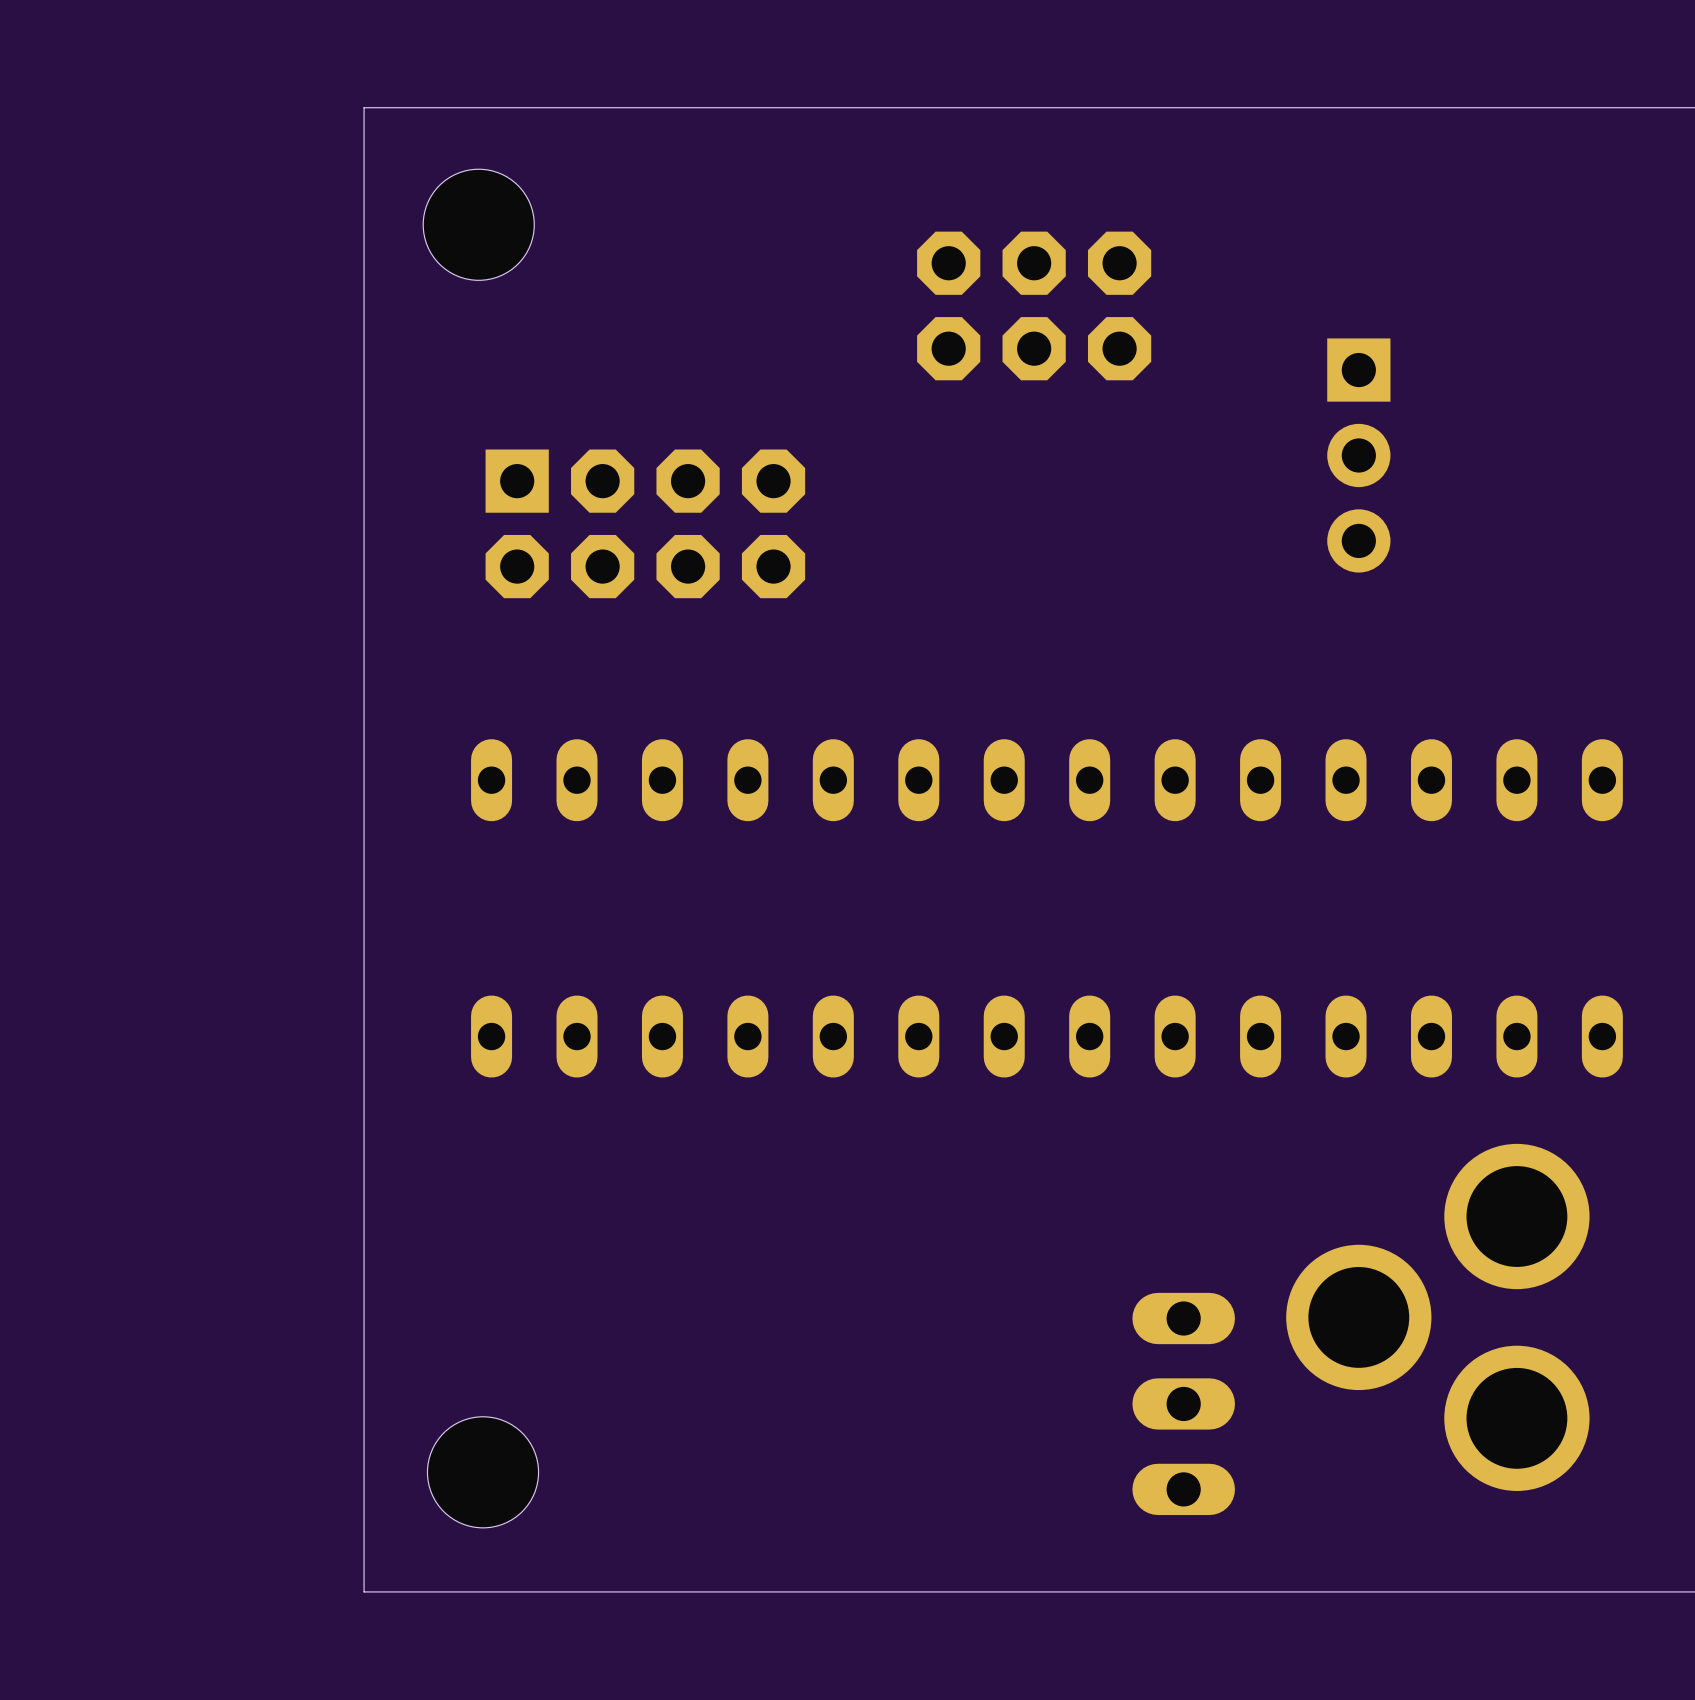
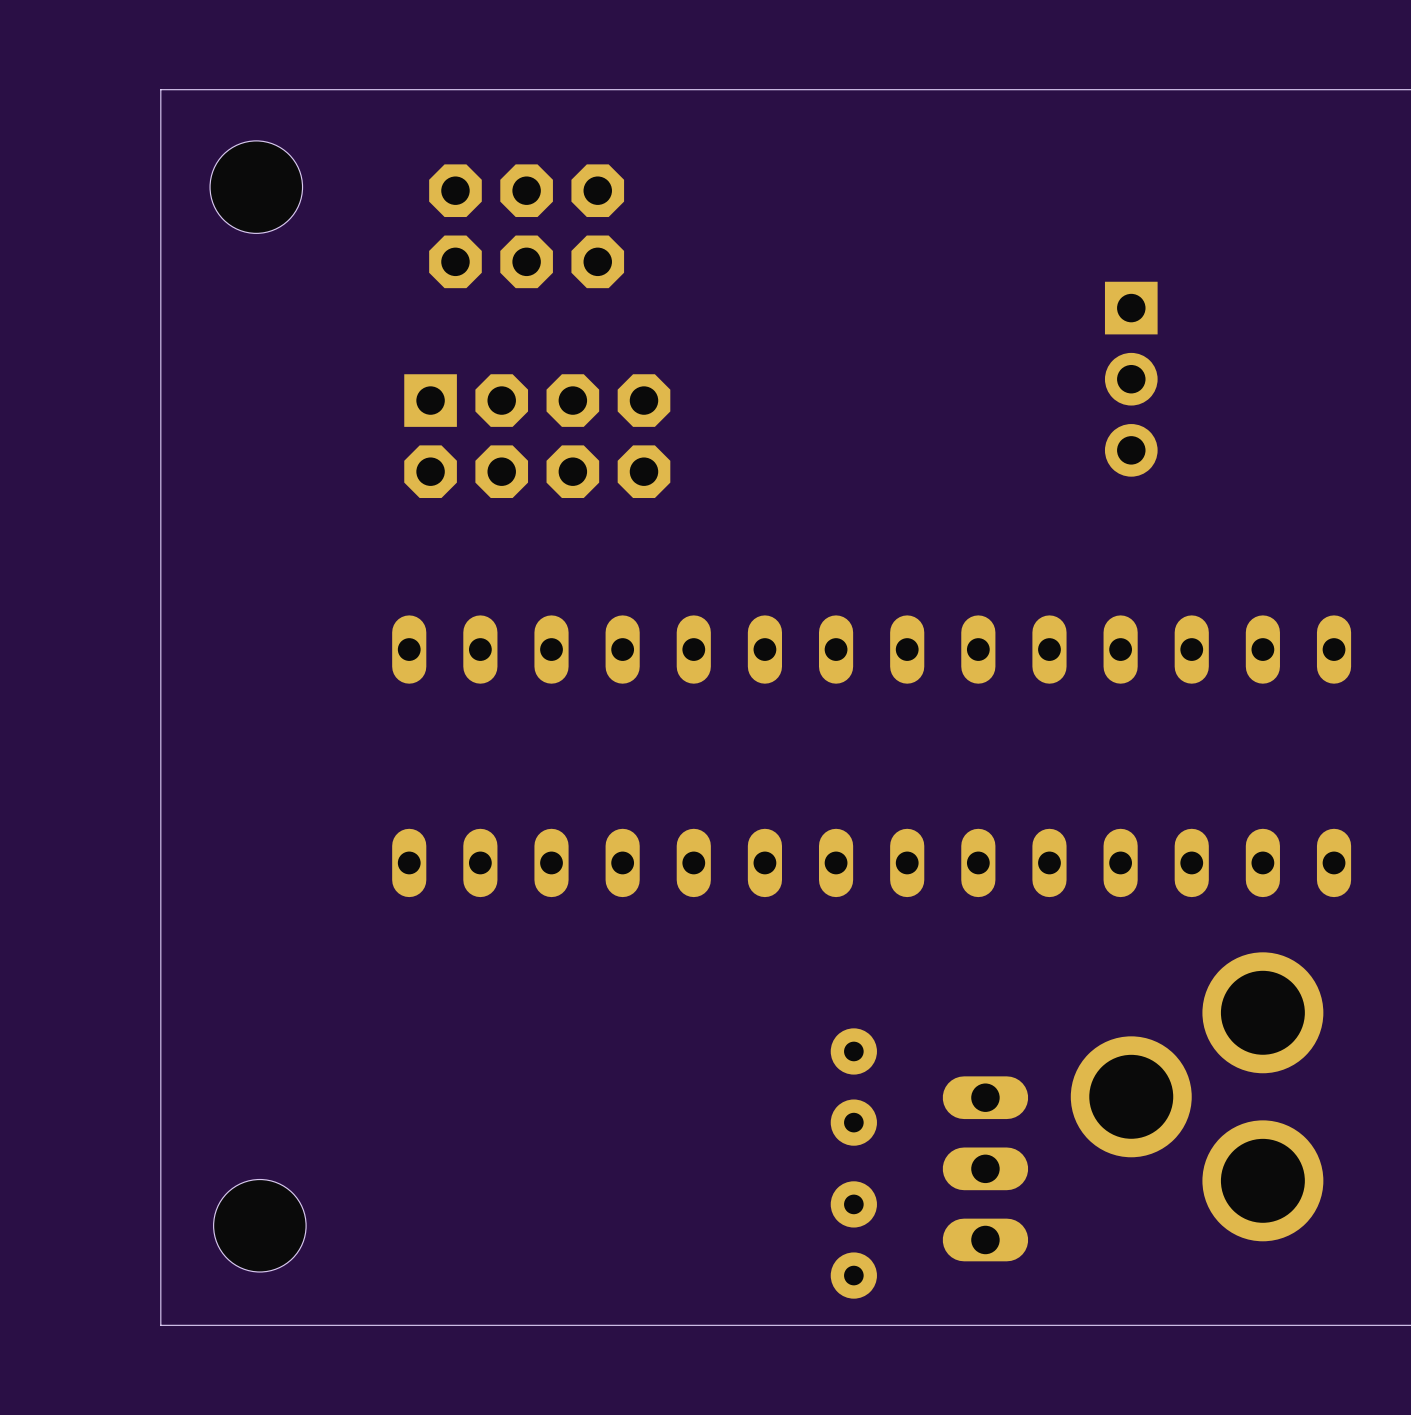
board edge: (364, 107) (364, 1591) -> (303, 89) (160, 89) (160, 1325) (303, 1325)
part position: (478, 224) -> (256, 187)
part position: (1034, 305) -> (526, 226)
part: none -> (853, 1087)
part position: (483, 1472) -> (259, 1225)
part: none -> (853, 1239)

